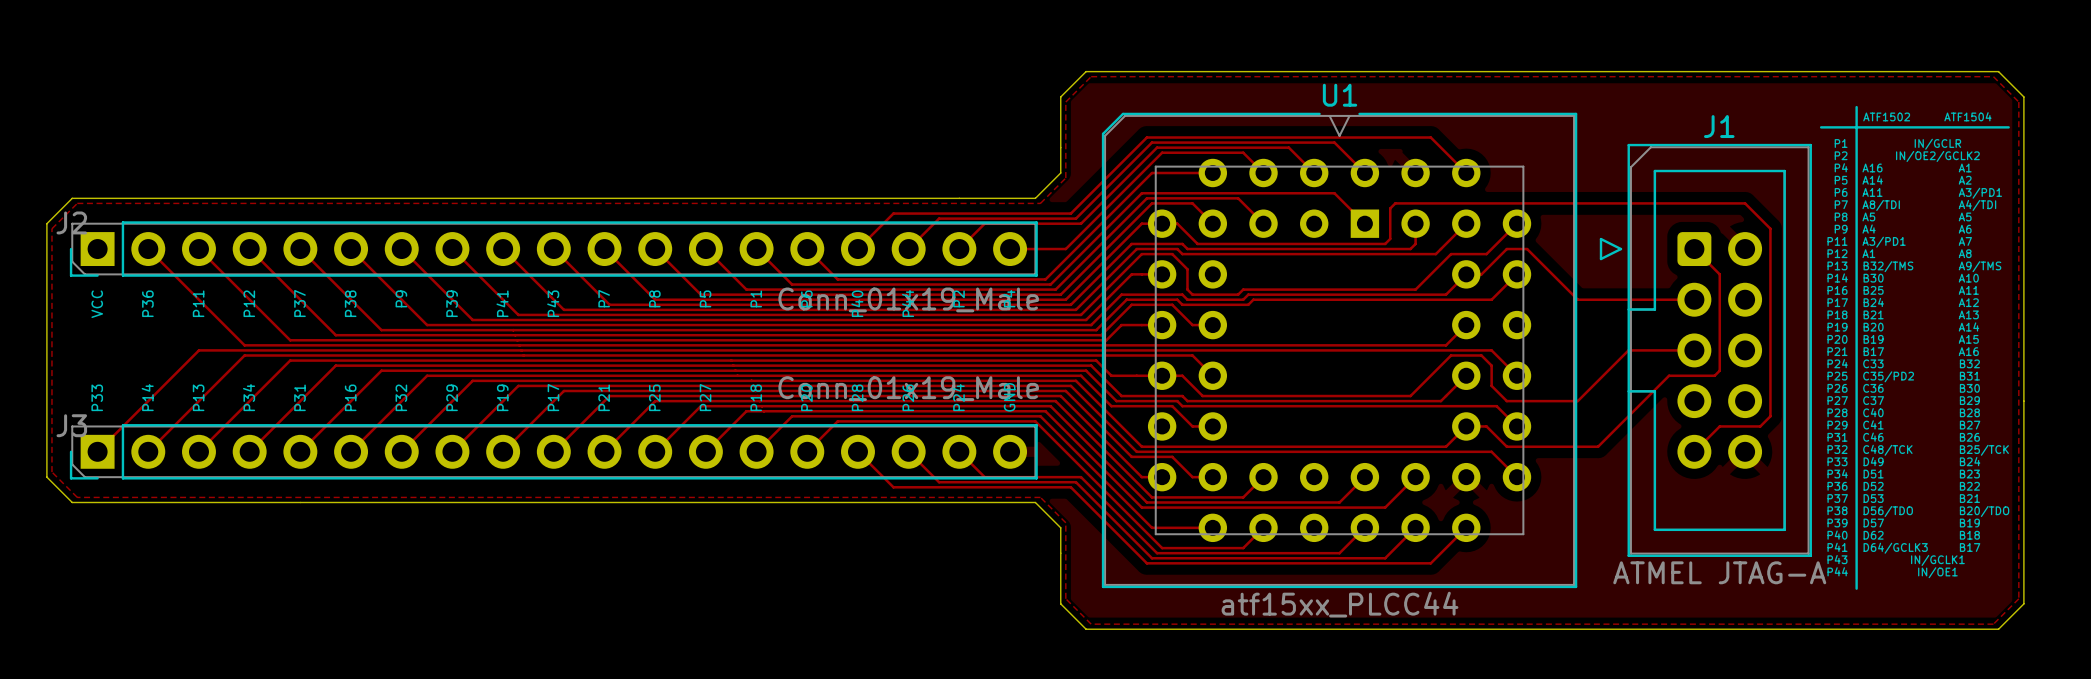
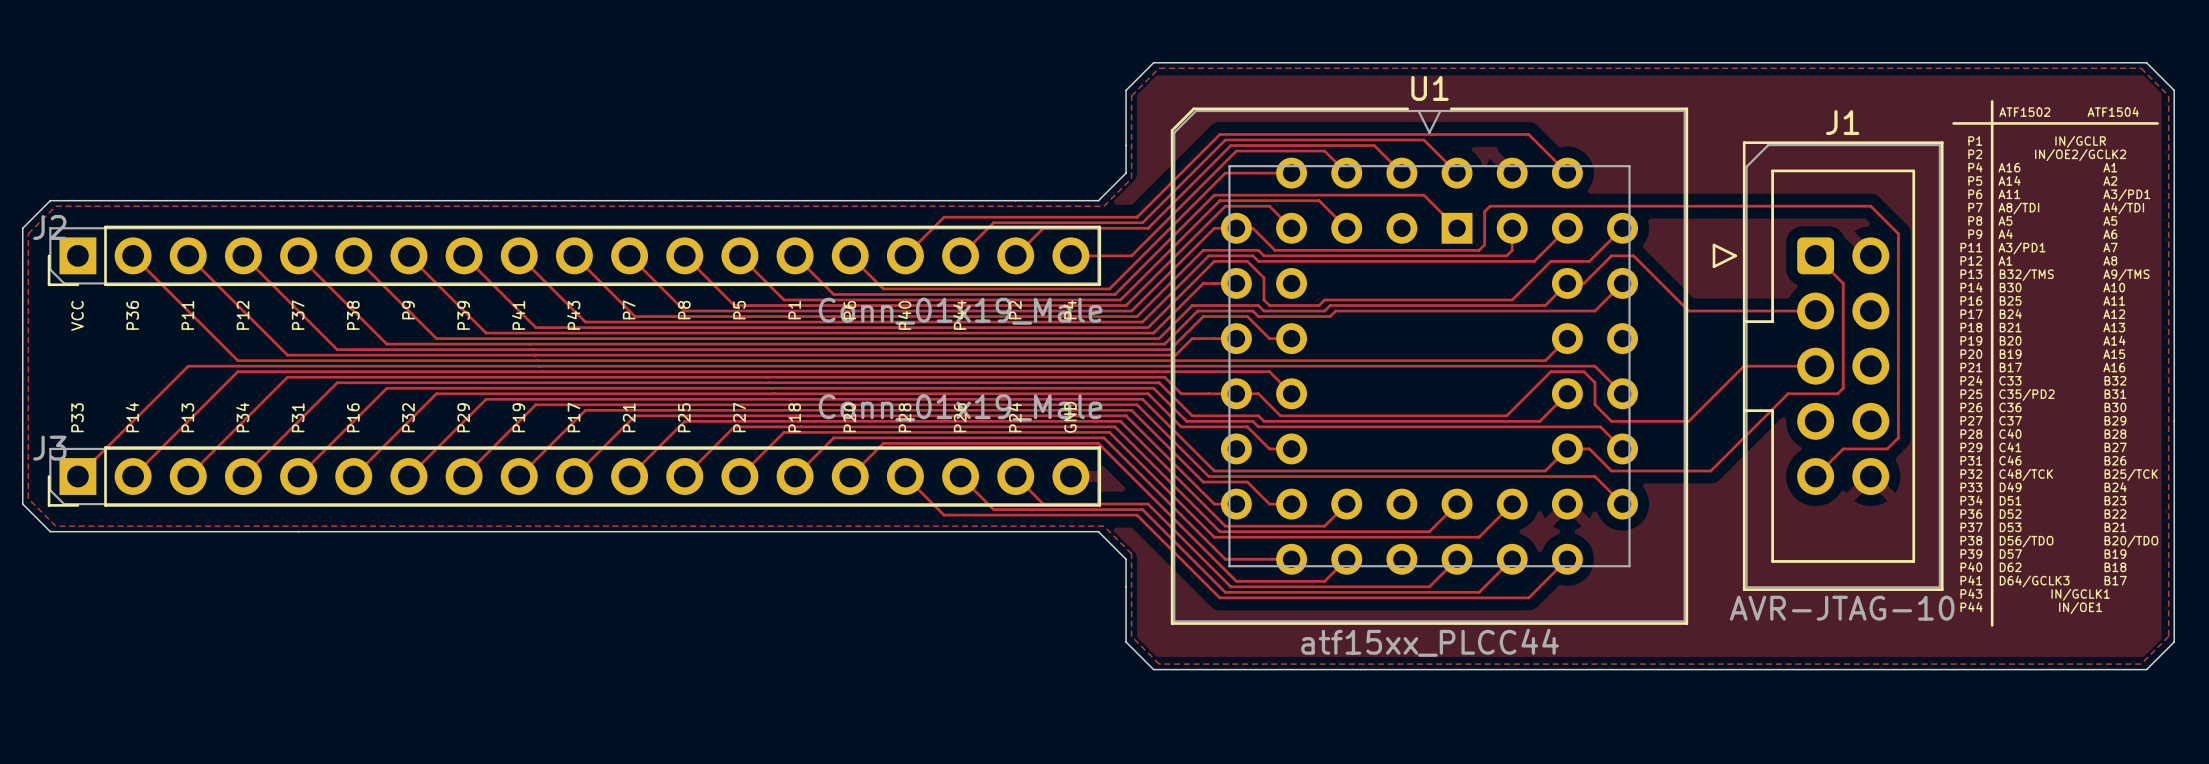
J1 value: ATMEL JTAG-A (1719, 572) -> AVR-JTAG-10 (1842, 608)

